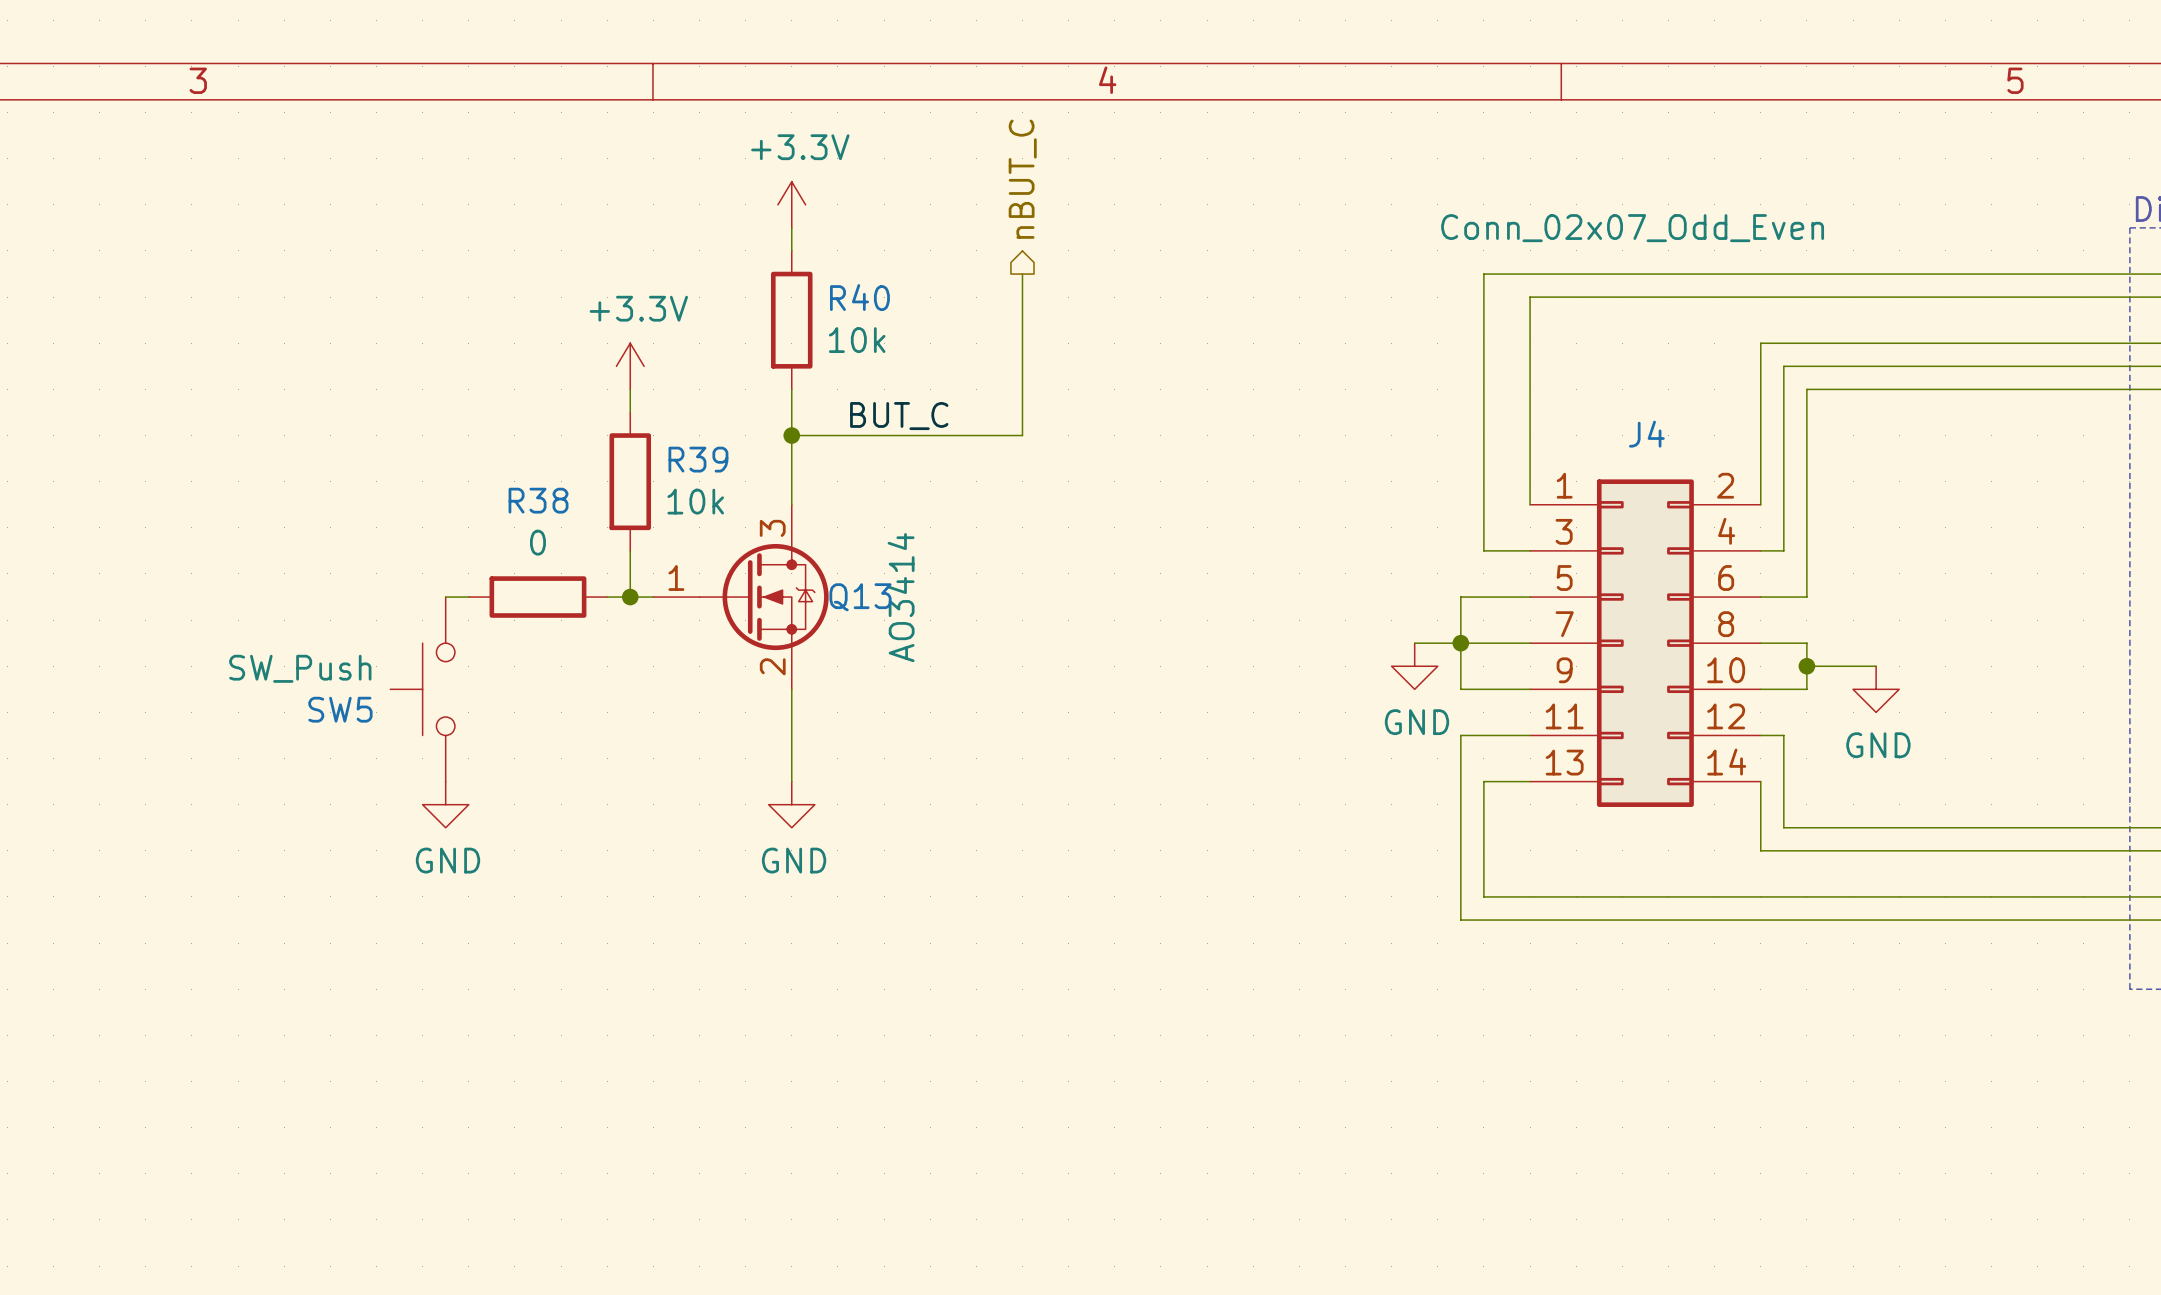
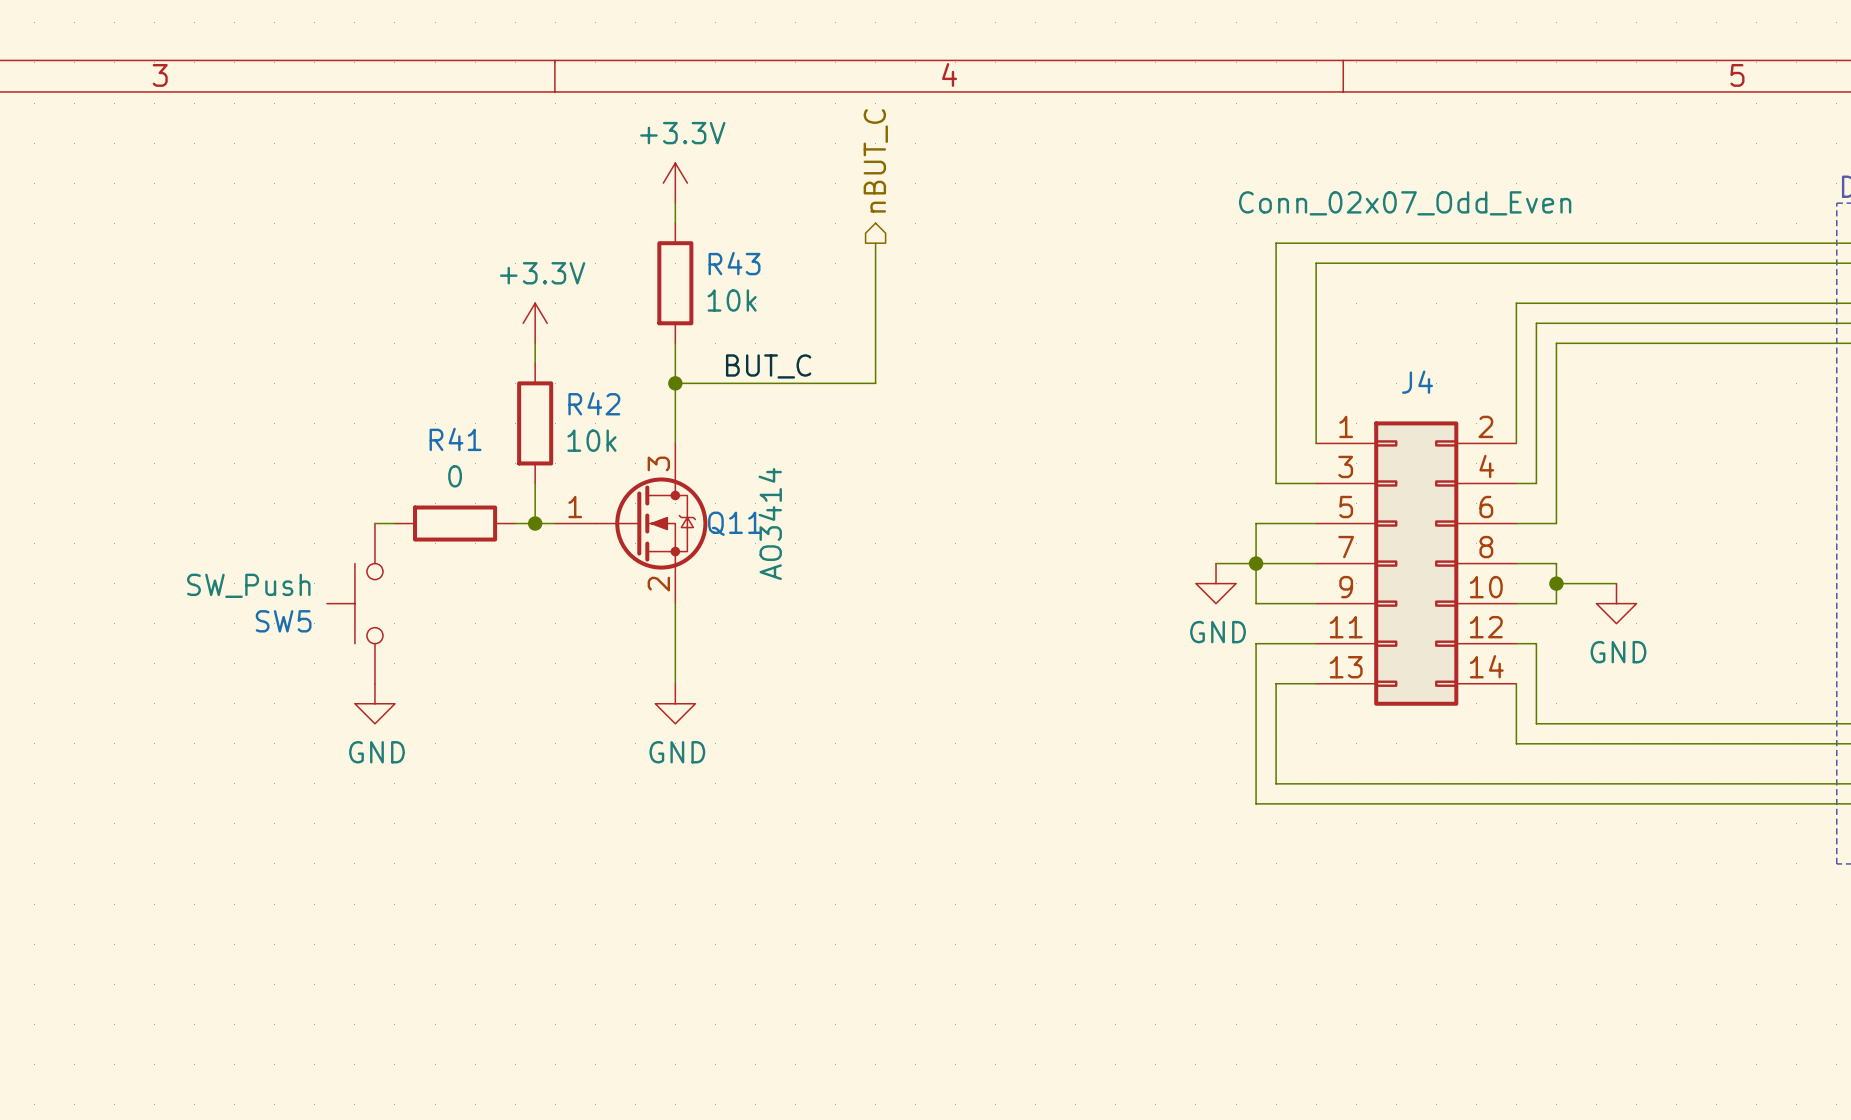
R40 name: R40 (859, 297) -> R43 (734, 263)
R39 name: R39 (698, 459) -> R42 (594, 403)
R38 name: R38 (538, 500) -> R41 (455, 439)
Q13 name: Q13 (860, 597) -> Q11 (735, 523)

